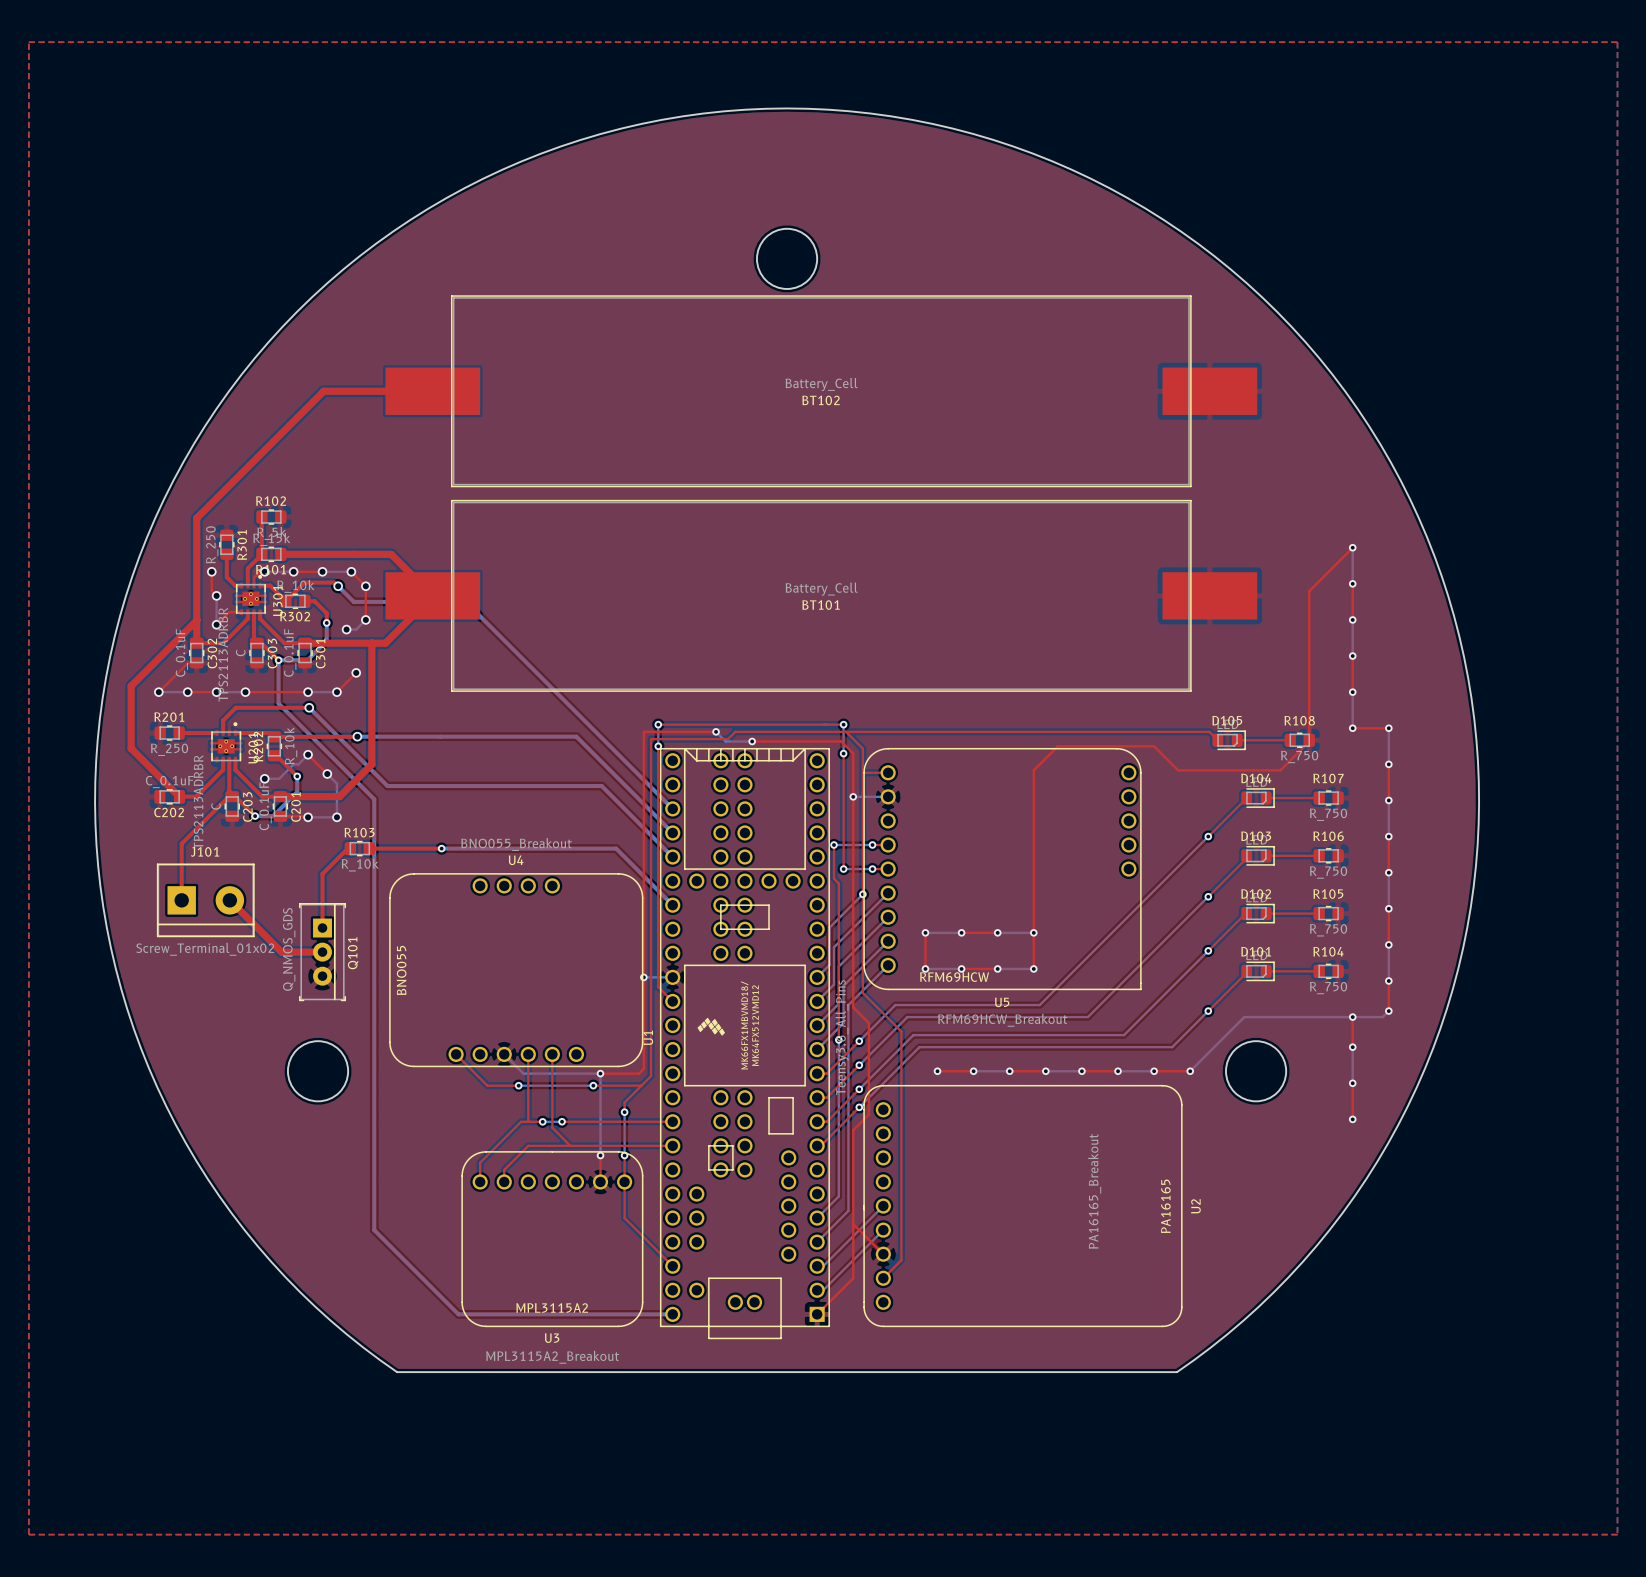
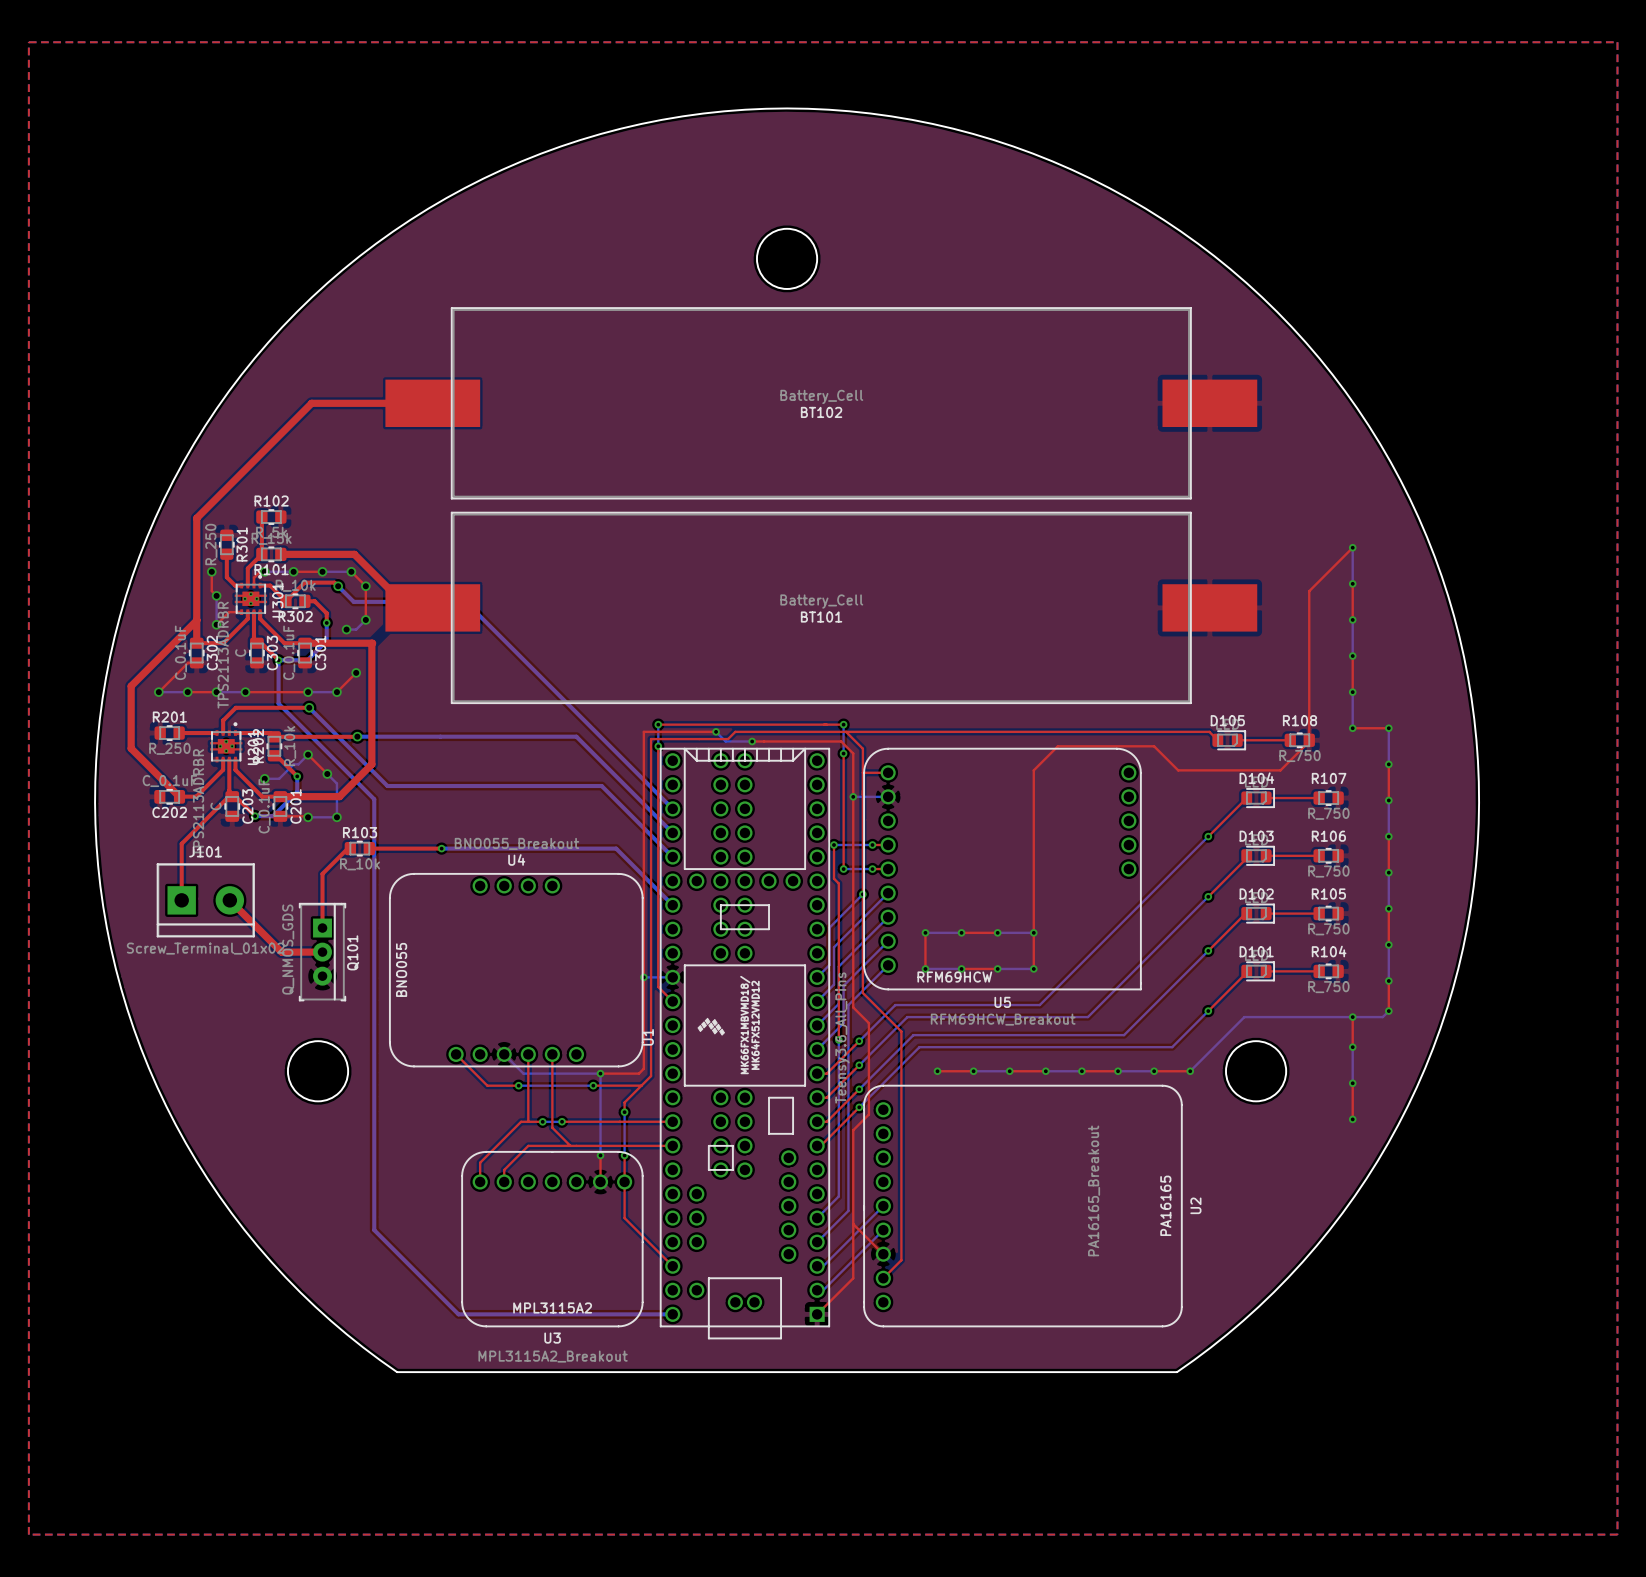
top track: (444, 391) (323, 391) (311, 403) -> (432, 403) (311, 403)
BT102 position: (821, 391) -> (821, 403)
top track: (354, 554) (391, 554) (432, 595) (385, 643) (372, 643) -> (354, 554) (407, 607) (432, 607)
BT101 position: (821, 595) -> (821, 607)

